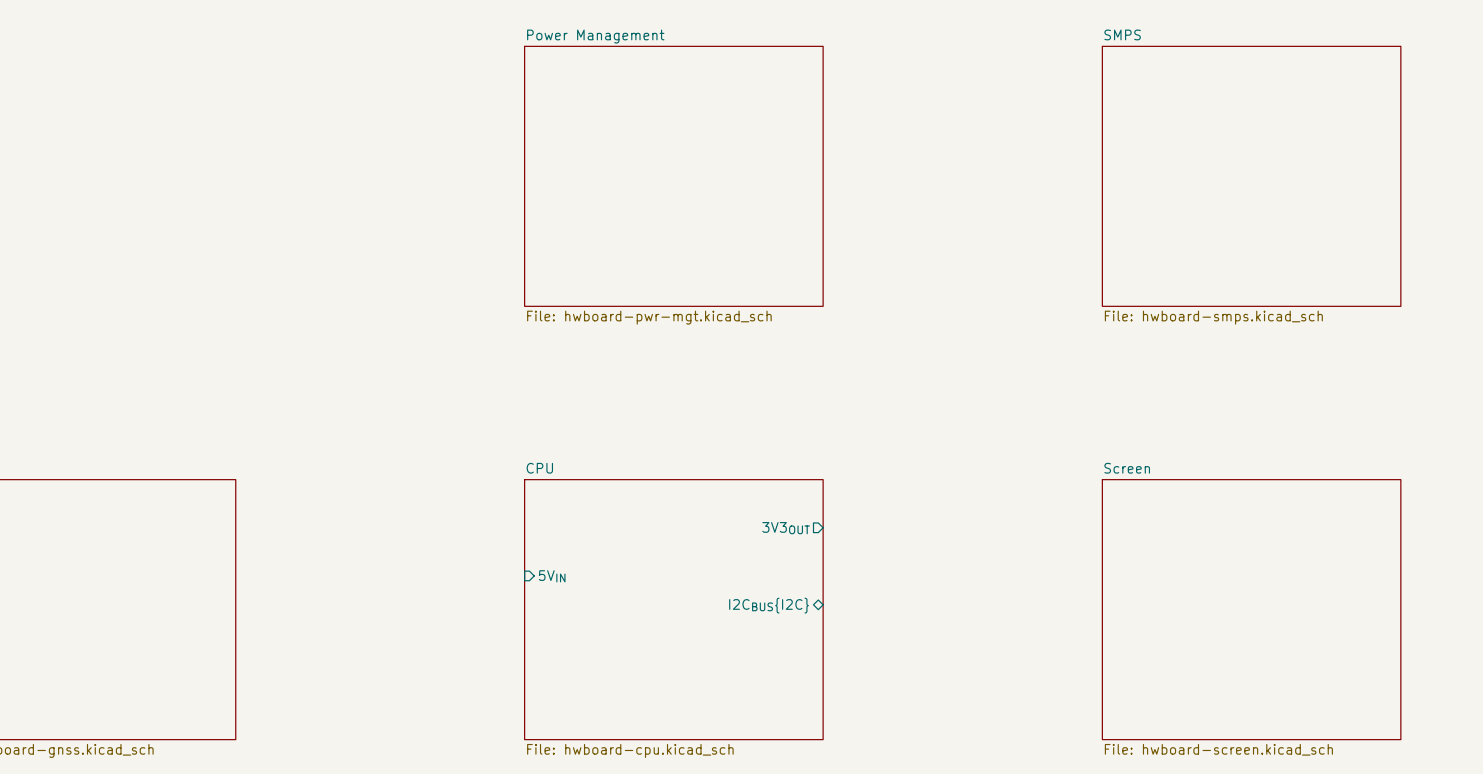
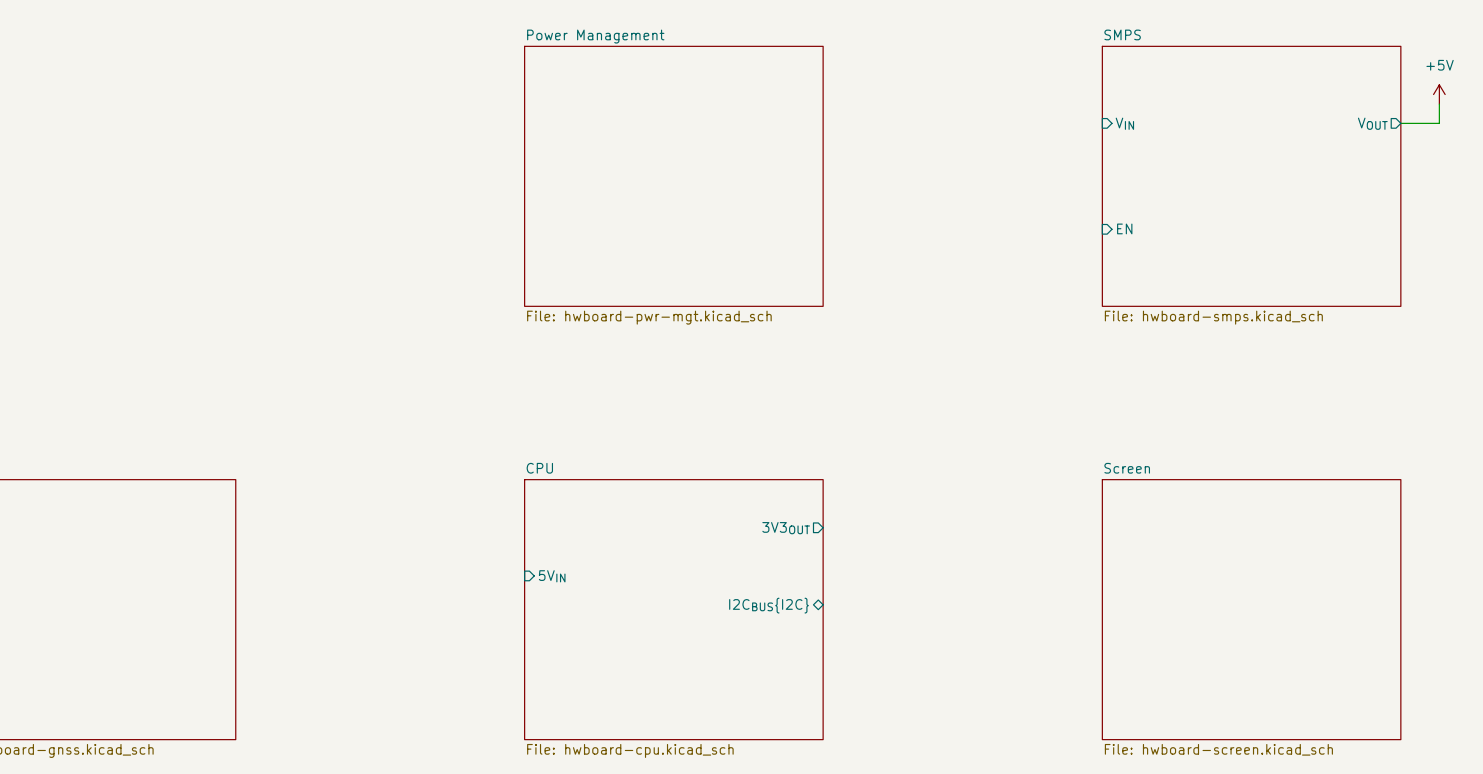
power symbol: none -> +5V (1439, 94)
wire: none -> (1439, 104) (1439, 123) (1400, 123)
sheet pin: none -> VIN (1124, 123)
sheet pin: none -> VOUT (1372, 123)
sheet pin: none -> EN (1124, 228)

